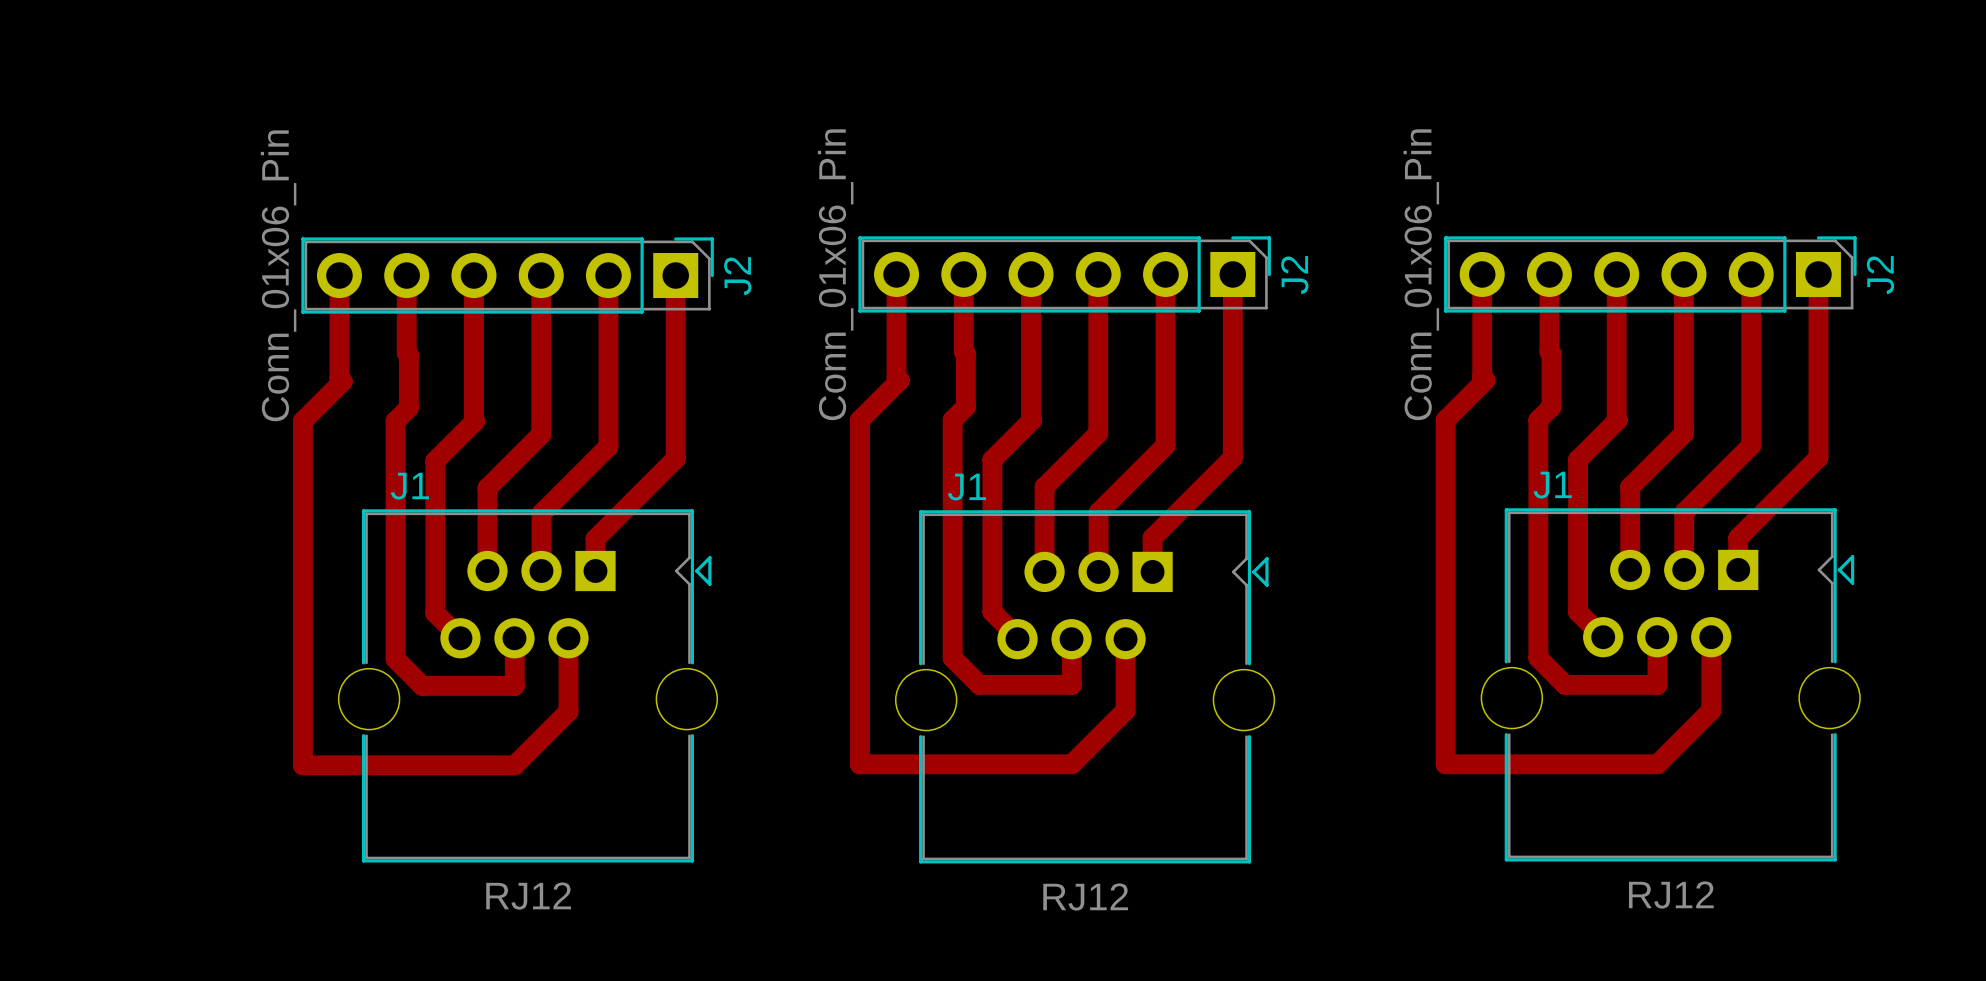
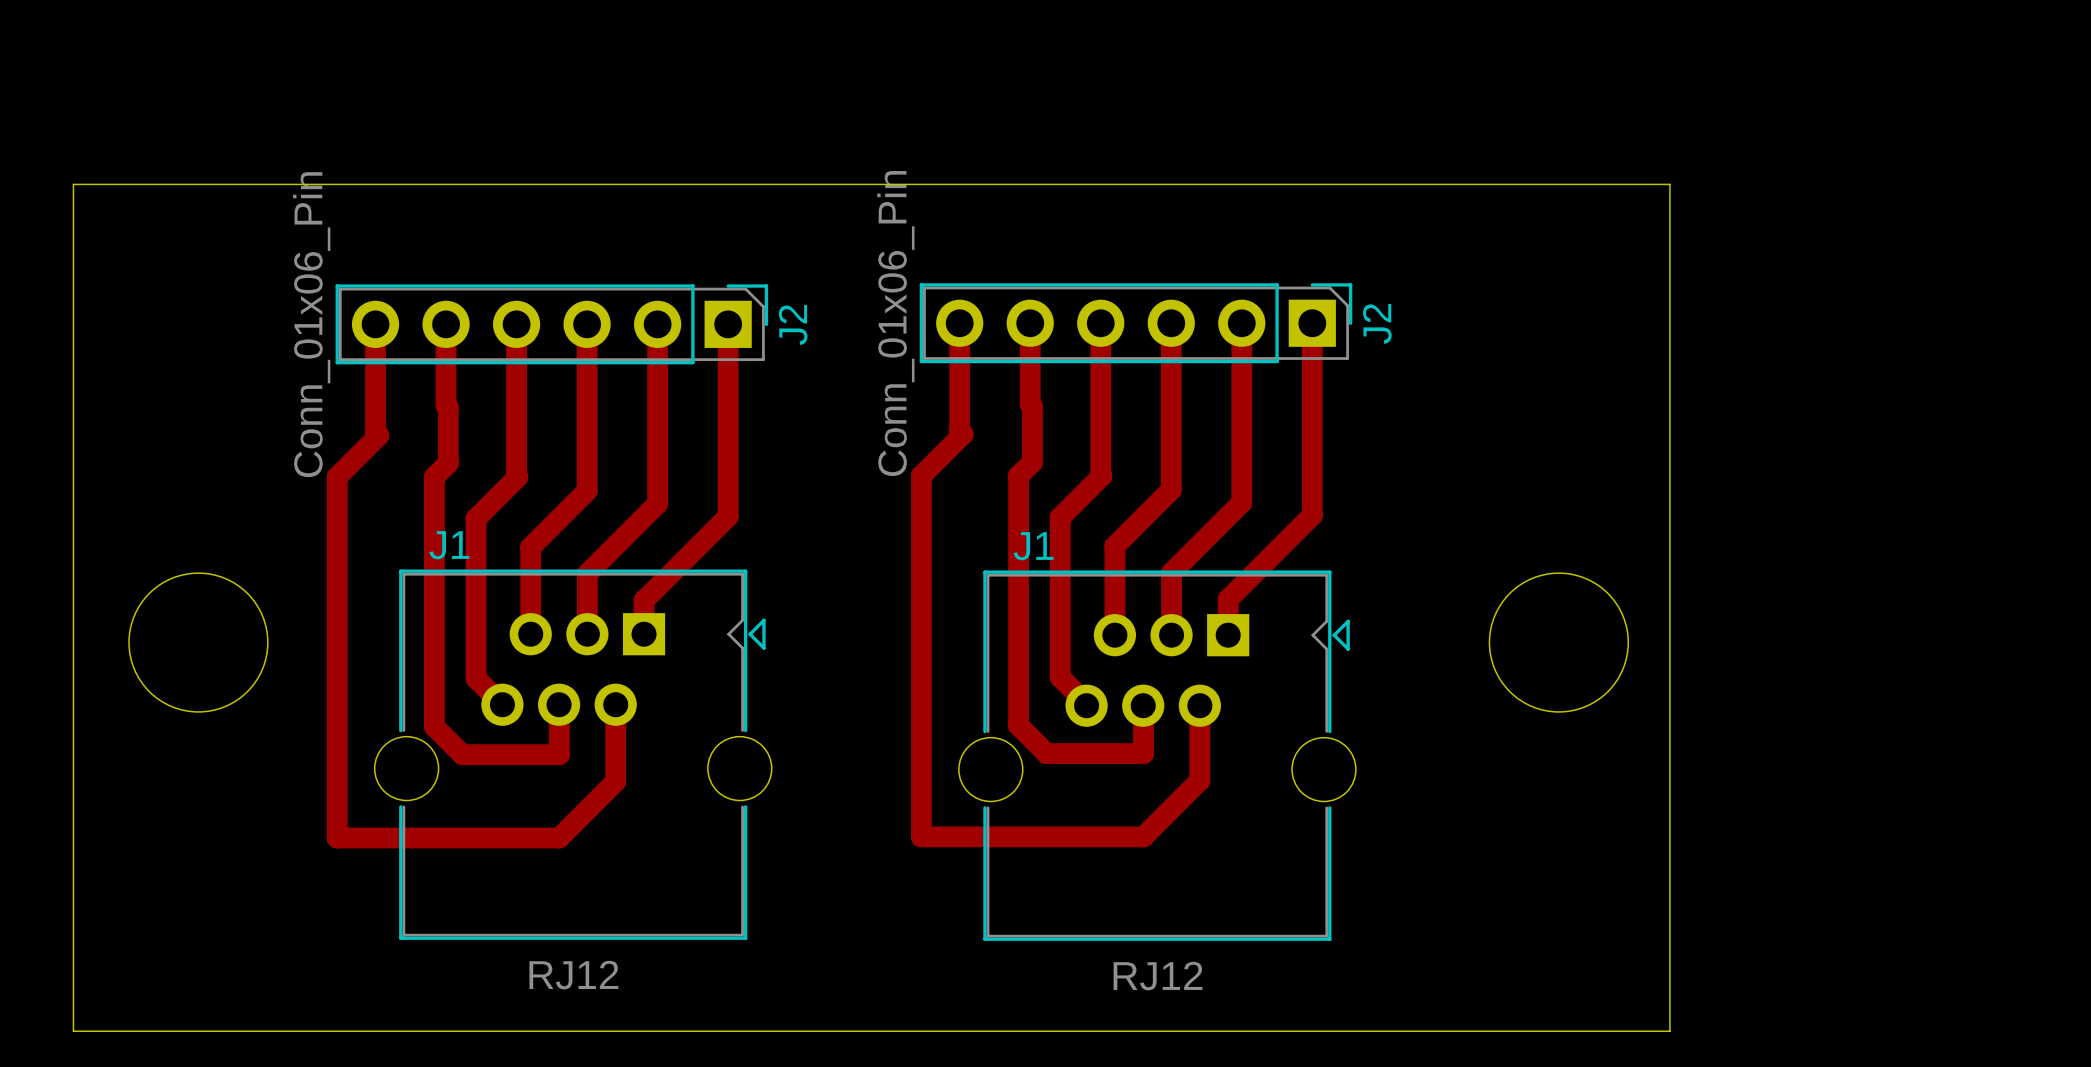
board edge: none -> (73, 184) (1669, 184) (1669, 1031) (73, 1031) (73, 184)
track: (1482, 274) (1482, 377) (1485, 380) (1445, 420) (1445, 764) (1657, 764) (1711, 710) (1711, 637) -> none
track: (1549, 274) (1551, 406) (1538, 420) (1538, 658) (1565, 684) (1657, 684) (1657, 637) -> none
track: (1616, 274) (1617, 420) (1578, 459) (1578, 612) (1603, 637) -> none
J2: Conn_01x06_Pin (1650, 274) -> none
track: (1683, 274) (1683, 433) (1630, 487) (1630, 569) -> none
track: (1751, 274) (1751, 445) (1684, 512) (1684, 569) -> none
track: (1818, 274) (1818, 457) (1738, 537) (1738, 569) -> none
round board edge: none -> [128, 572, 269, 713]
round board edge: none -> [1488, 572, 1629, 713]
J1: RJ12 (1670, 684) -> none

